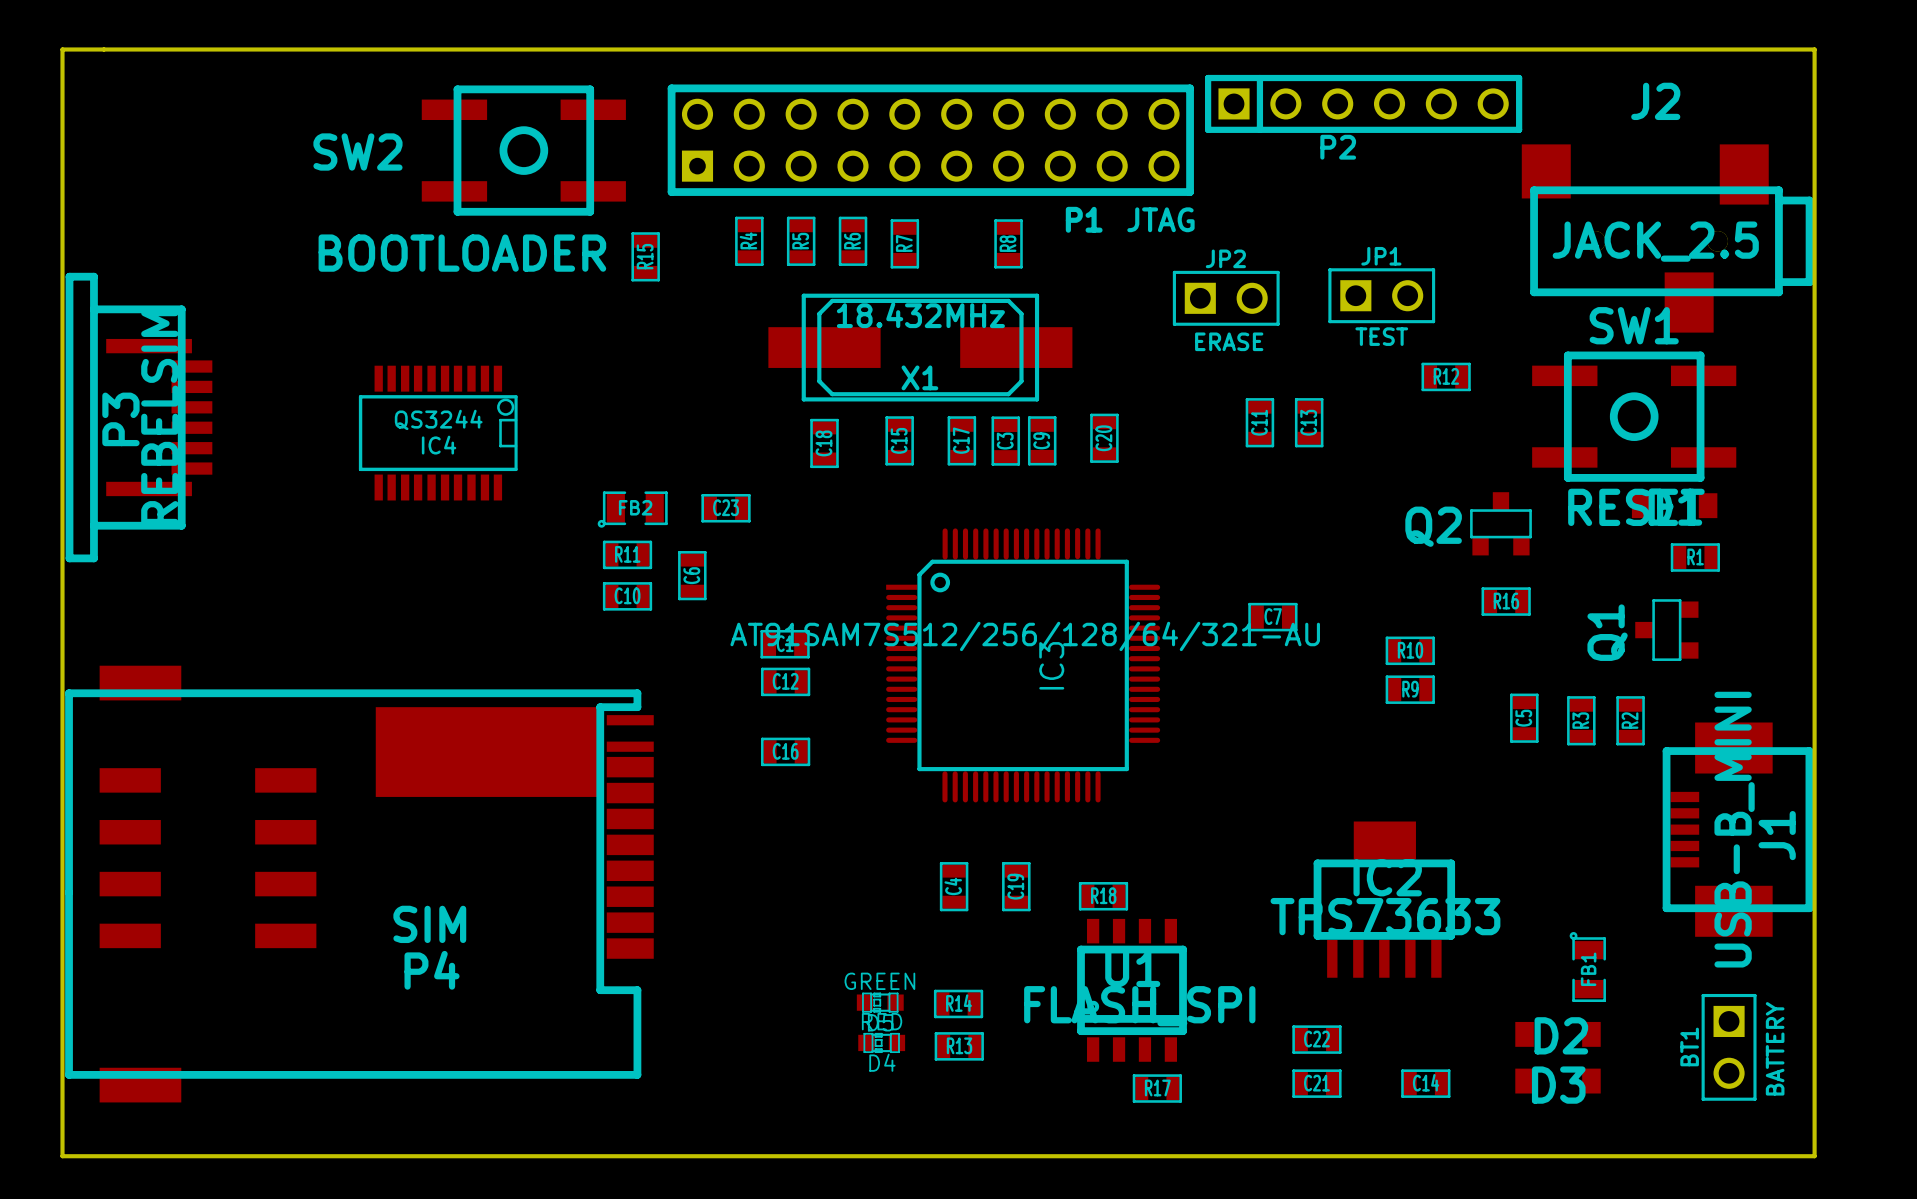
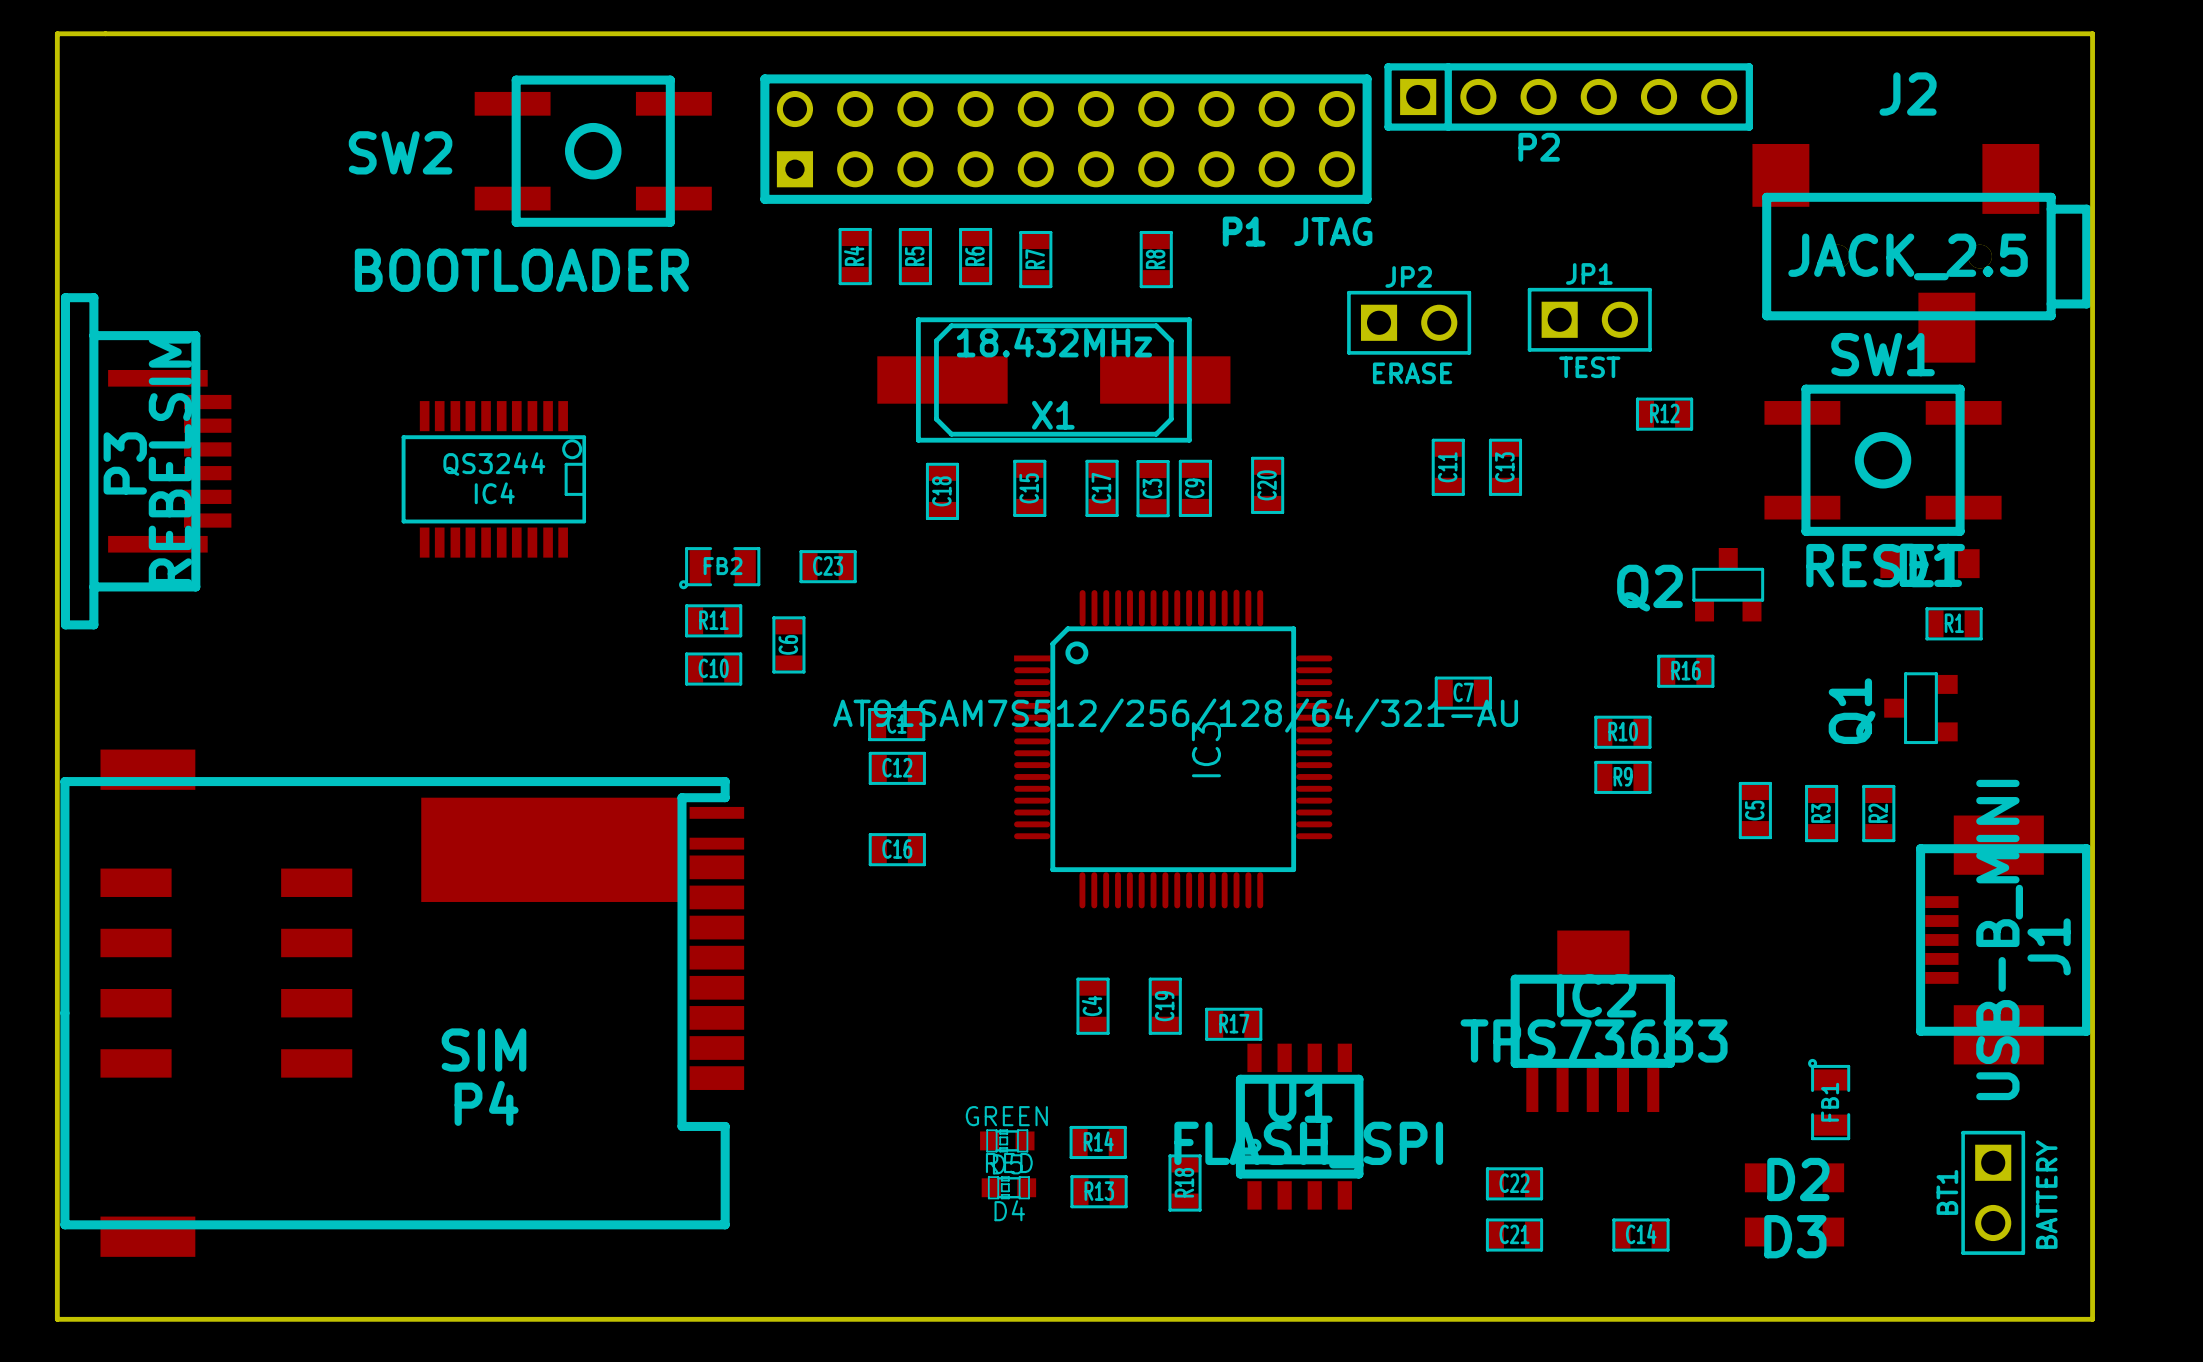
R15: (645, 256) -> none
R16 position: (1506, 601) -> (1685, 671)
R18 rotation: 0° (1103, 896) -> 90° clockwise (1185, 1183)
R18 position: (1103, 896) -> (1185, 1183)
R17 position: (1157, 1088) -> (1233, 1024)

